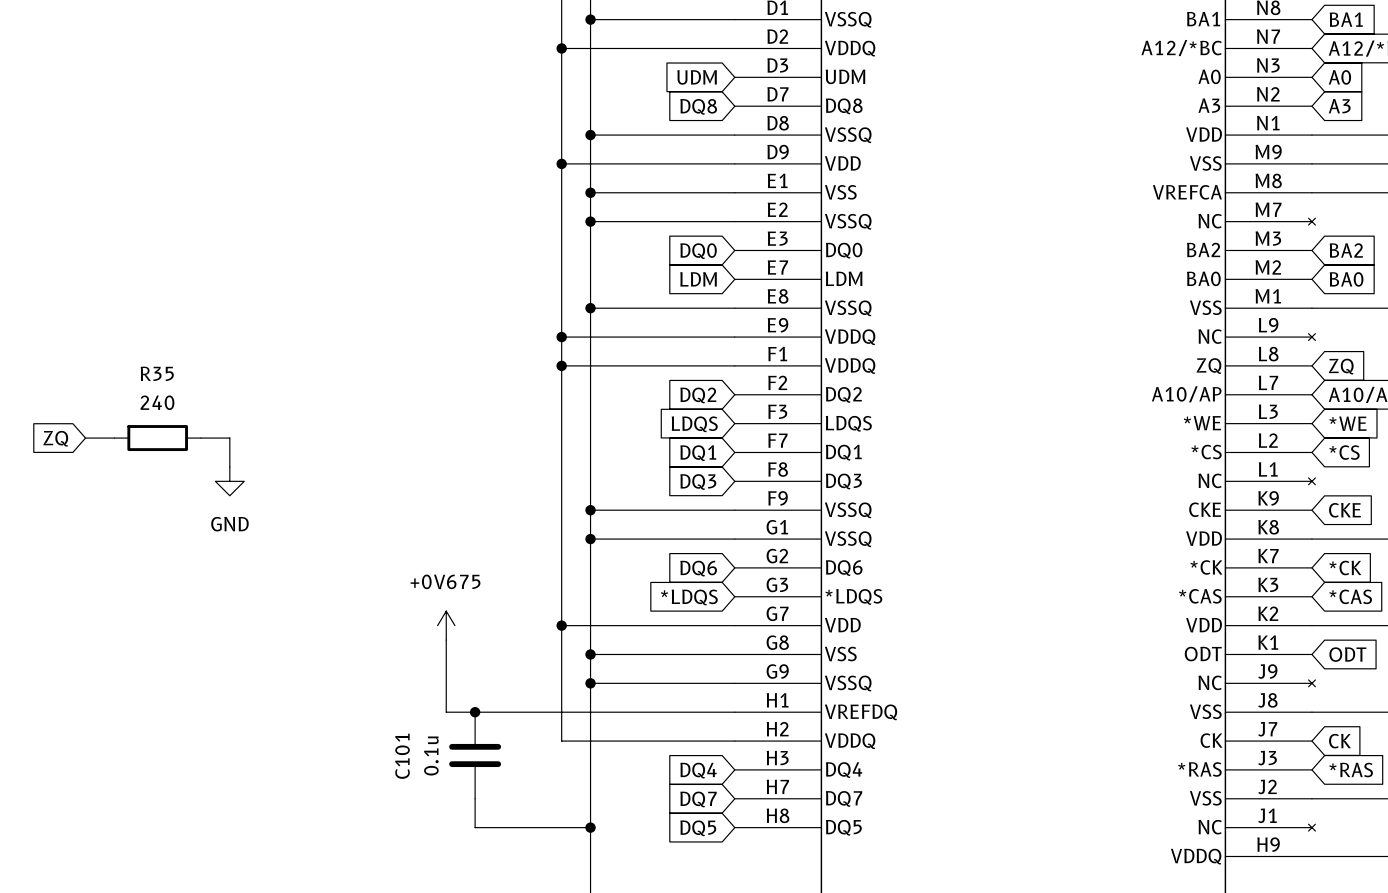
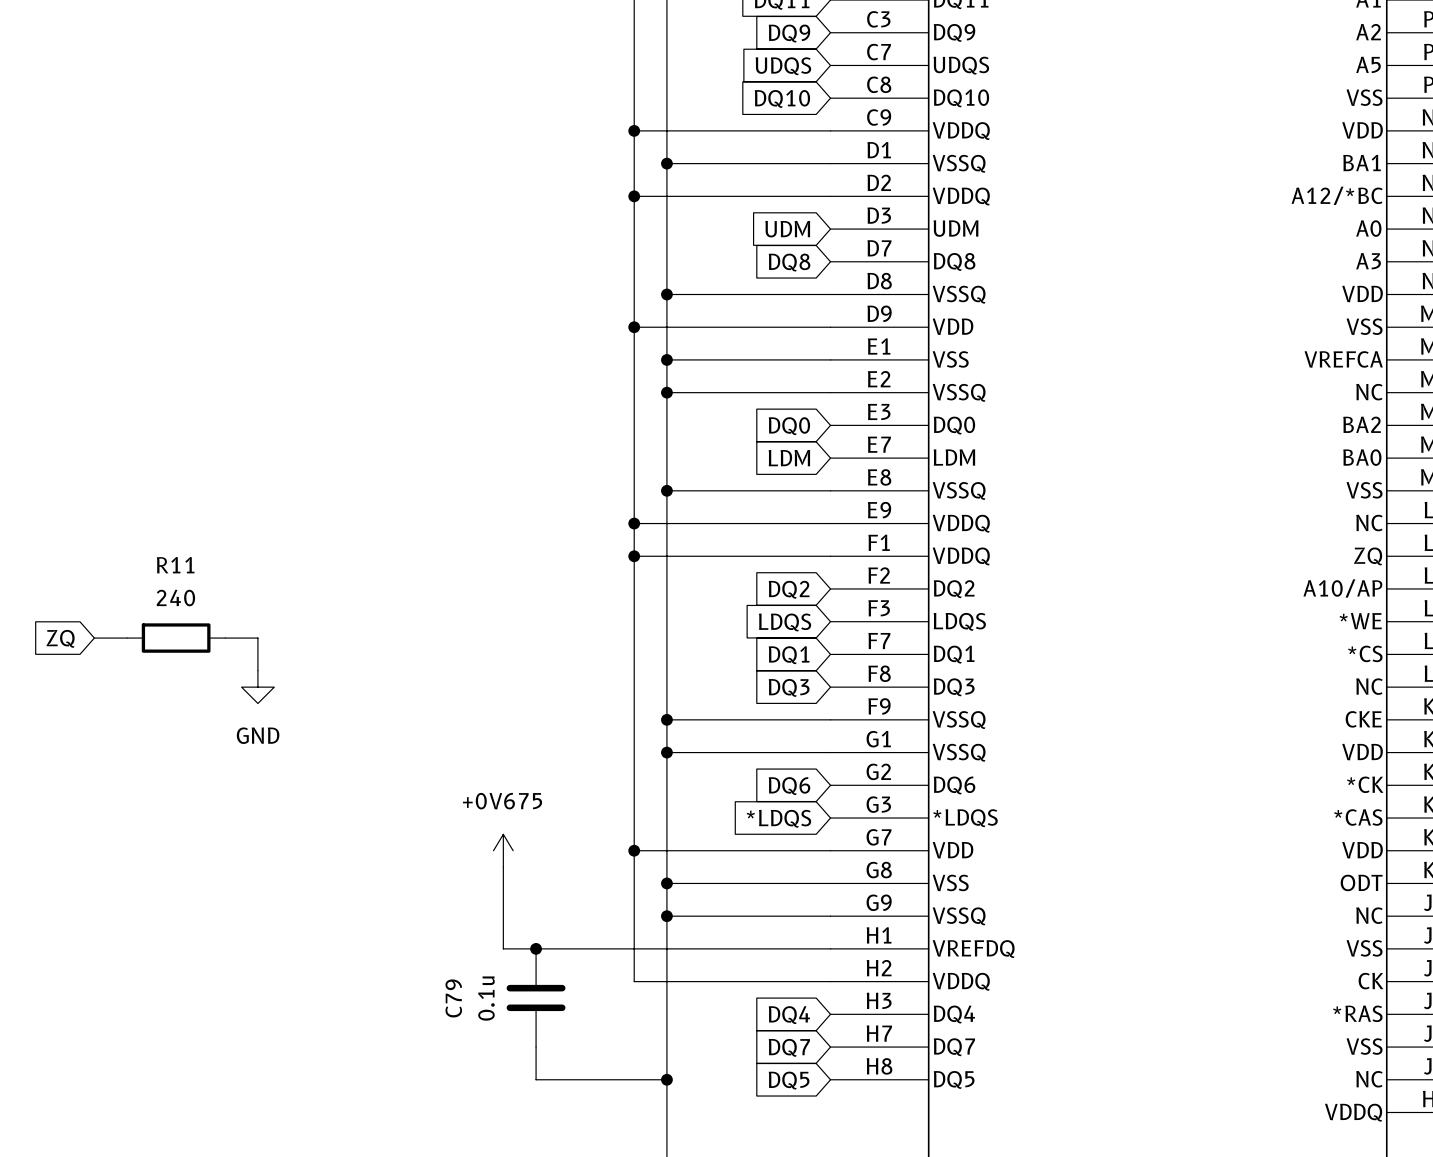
R35 name: R35 (157, 373) -> R11 (175, 565)
C101 name: C101 (402, 756) -> C79 (453, 998)

